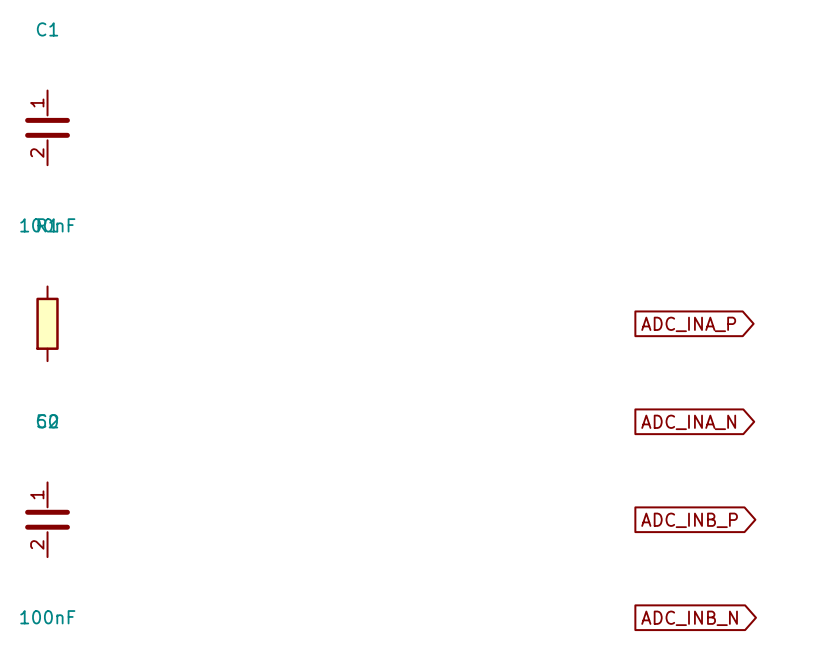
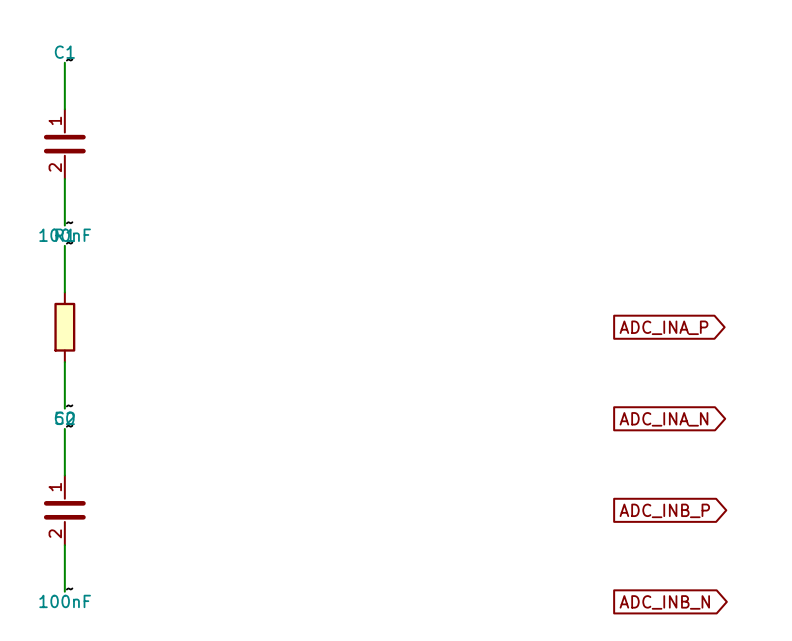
label: none -> ~ (69, 60)
wire: none -> (64, 62) (64, 109)
wire: none -> (64, 179) (64, 225)
label: none -> ~ (69, 222)
label: none -> ~ (69, 243)
wire: none -> (64, 245) (64, 292)
wire: none -> (64, 362) (64, 408)
label: none -> ~ (69, 405)
label: none -> ~ (69, 426)
wire: none -> (64, 428) (64, 475)
wire: none -> (64, 545) (64, 591)
label: none -> ~ (69, 588)

